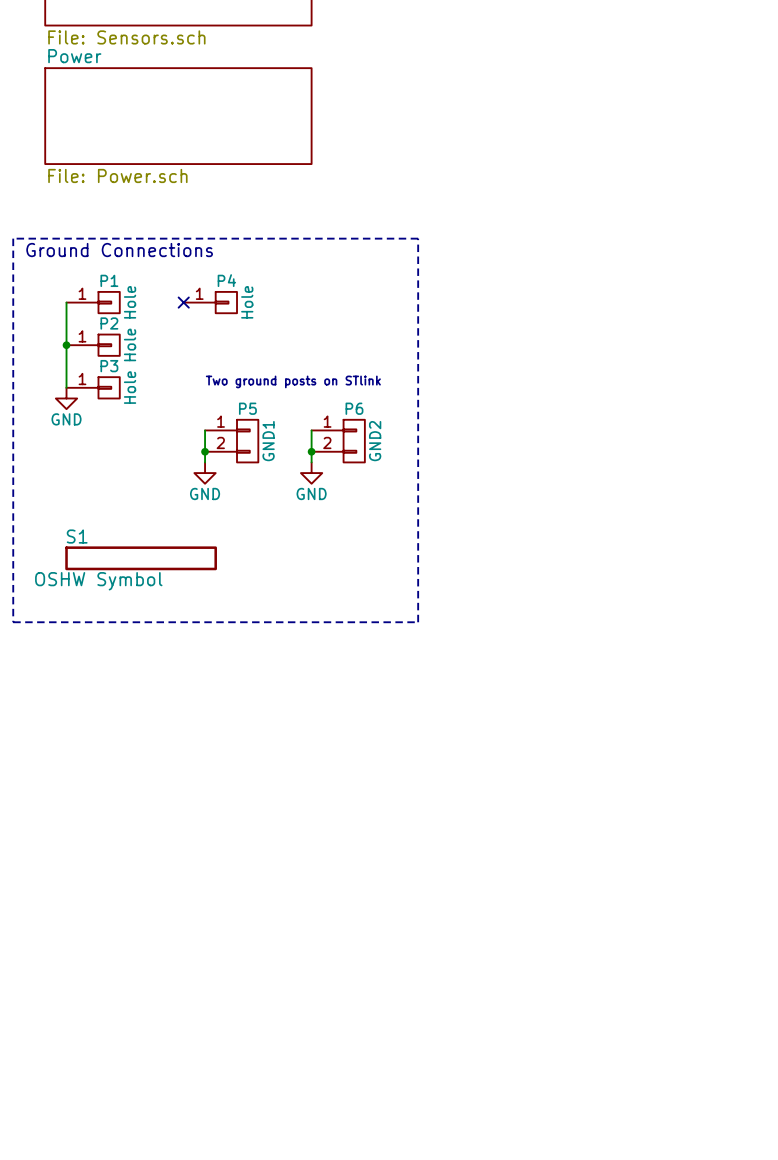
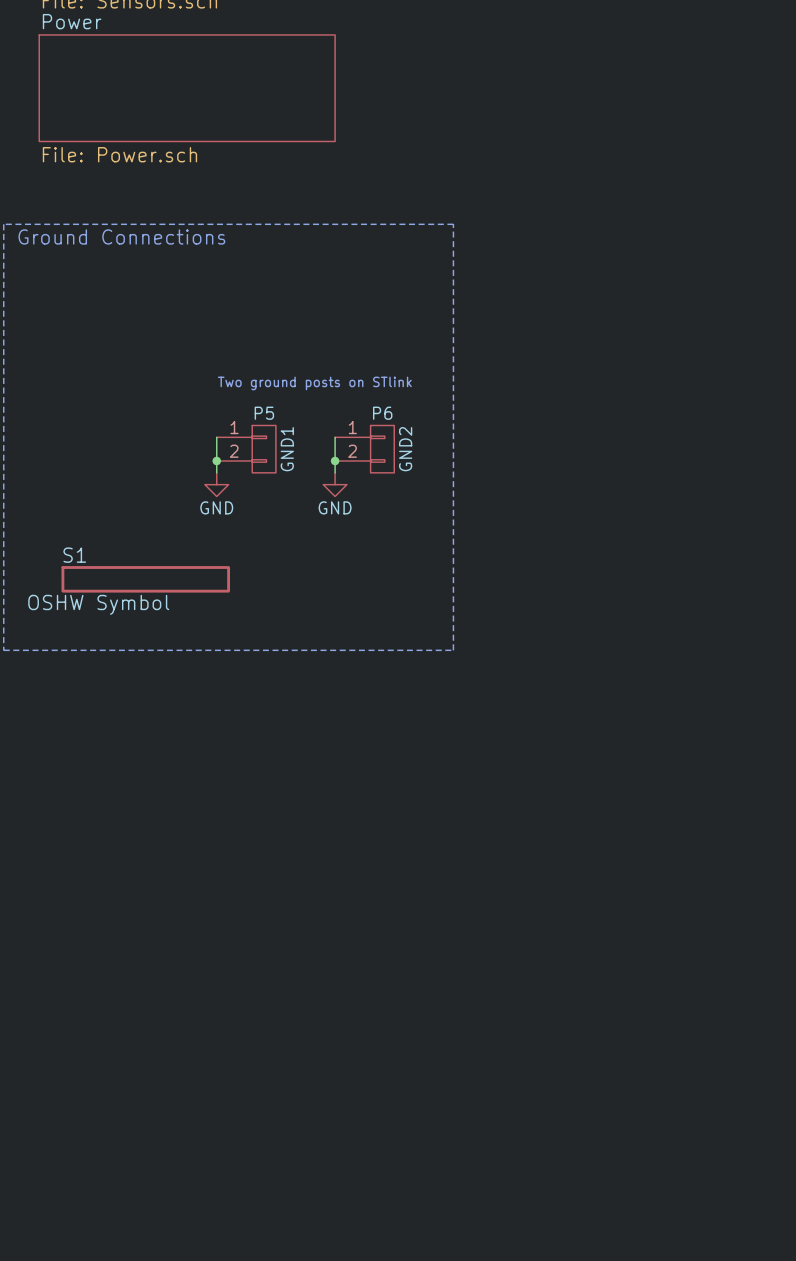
wire: (66, 302) (66, 387) -> none
P1: Hole (93, 302) -> none
no-connect mark: (183, 302) -> none
P4: Hole (210, 302) -> none
junction: (66, 345) -> none
P2: Hole (93, 345) -> none
P3: Hole (93, 387) -> none
power symbol: GND (66, 398) -> none

